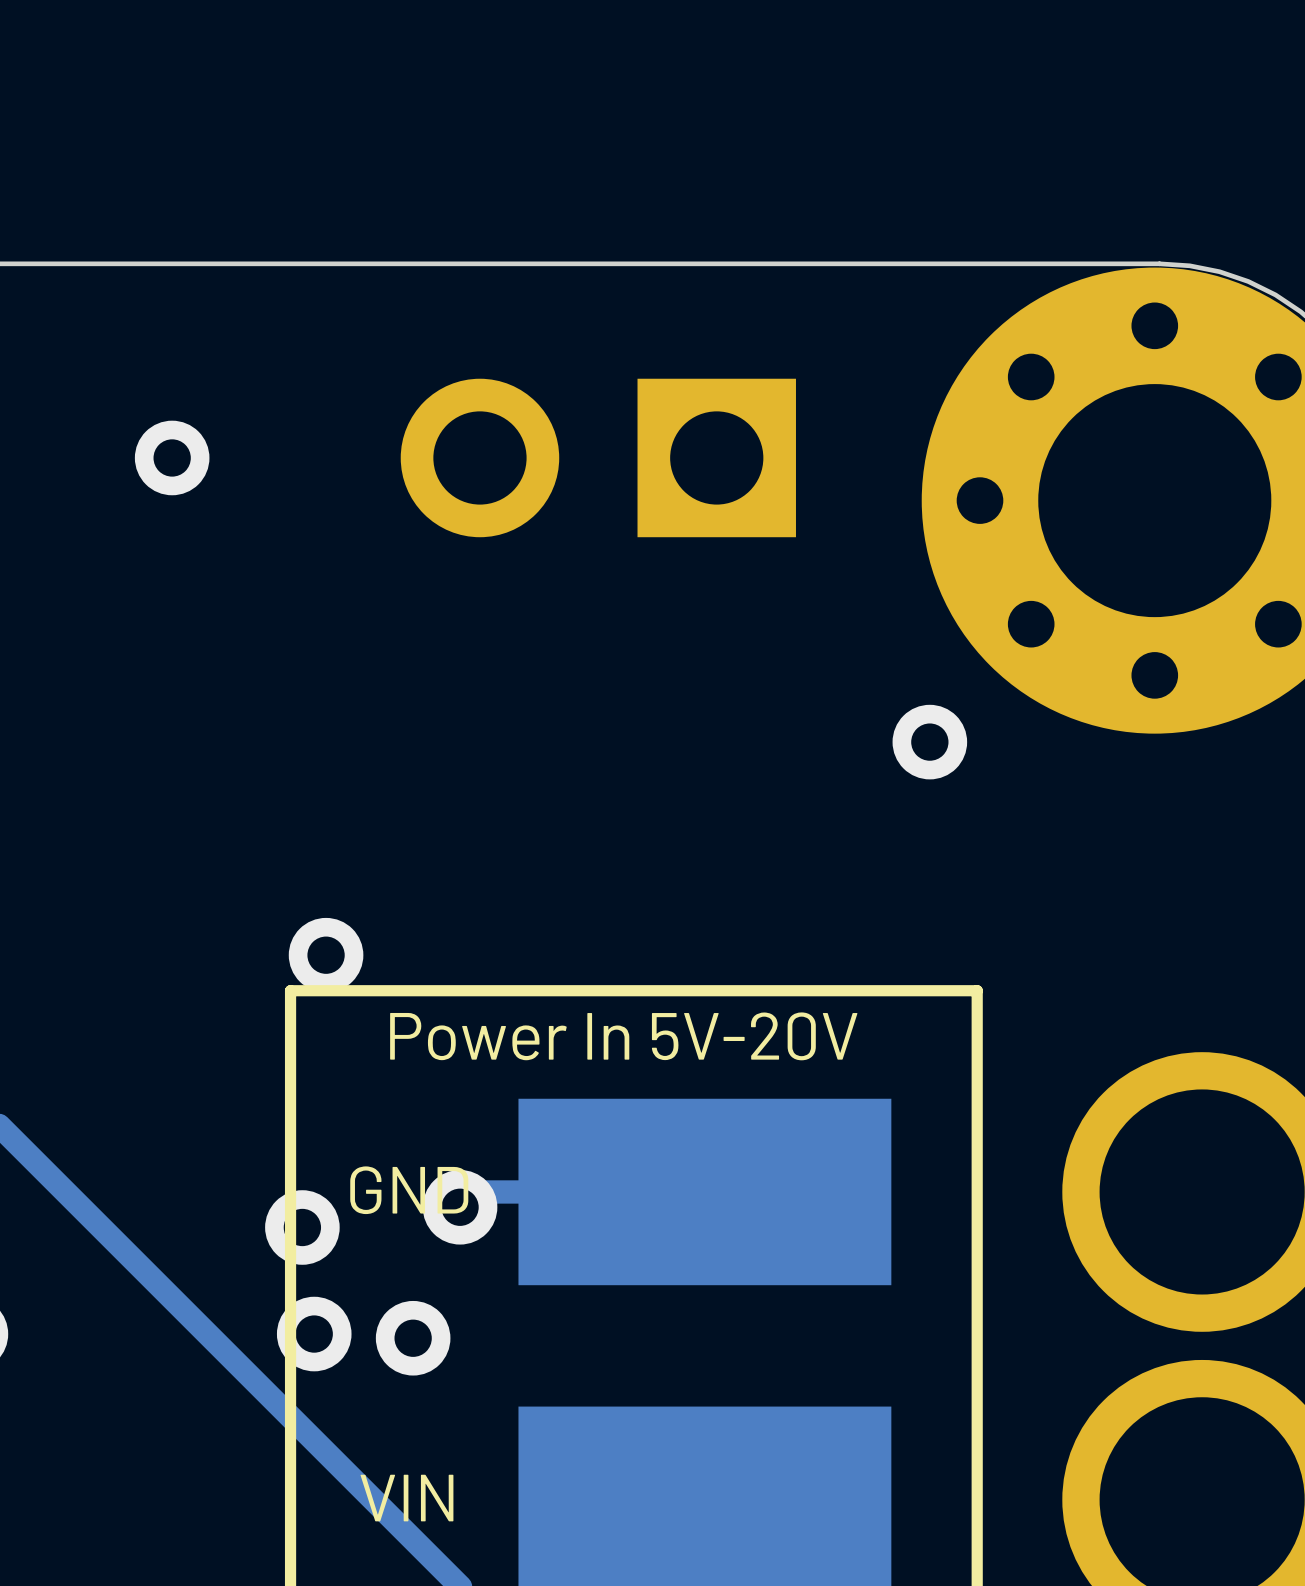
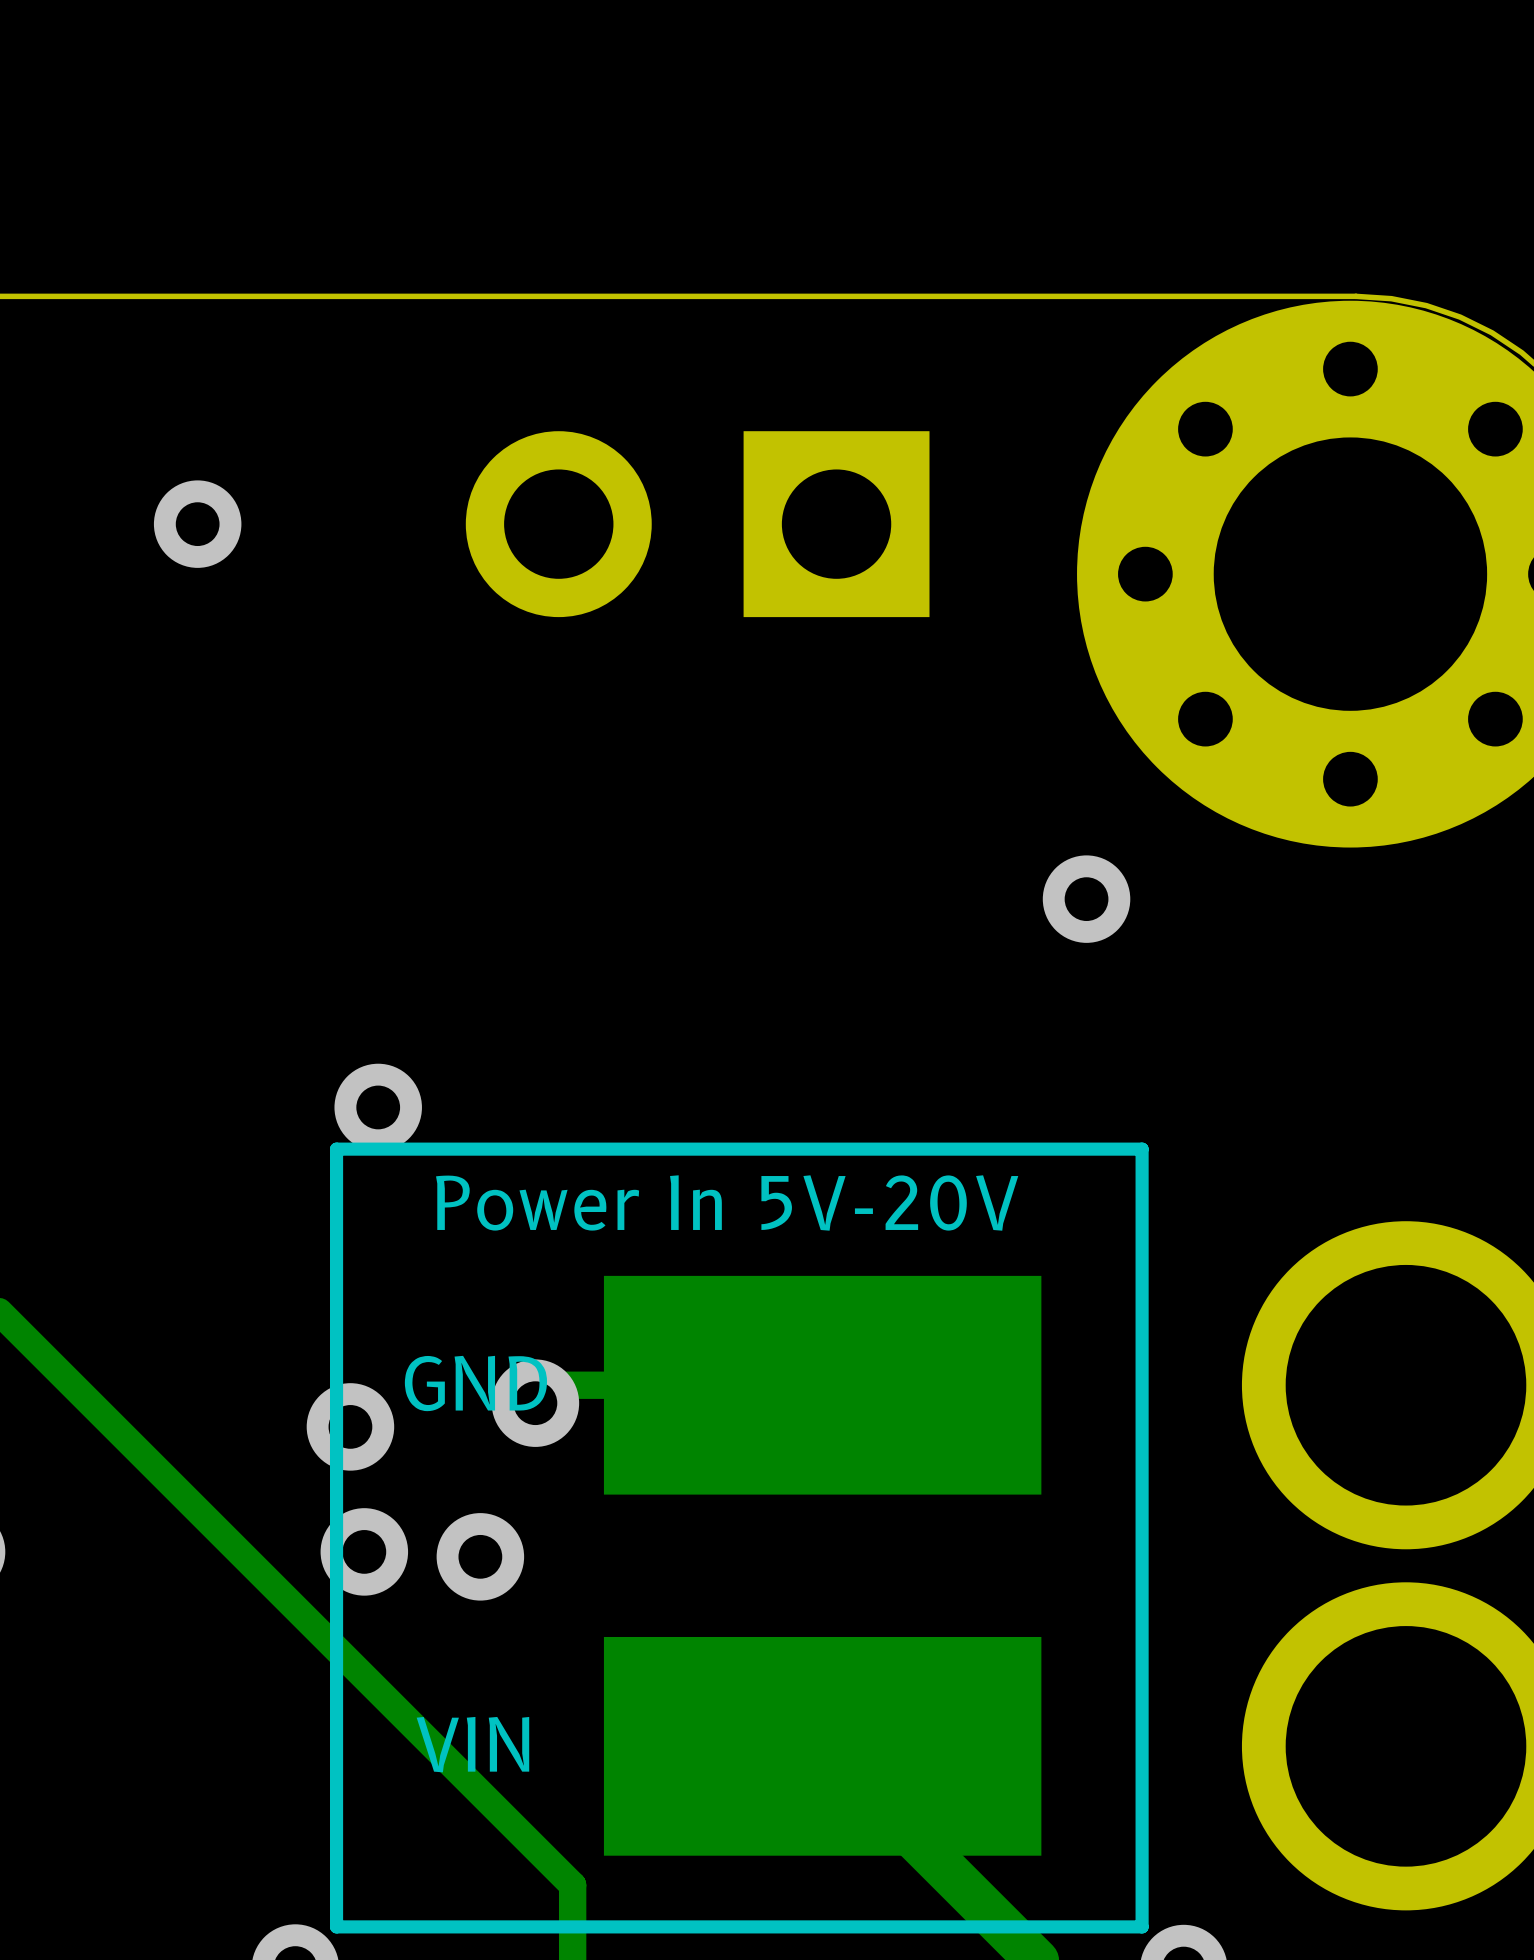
via position: (929, 742) -> (1086, 899)

